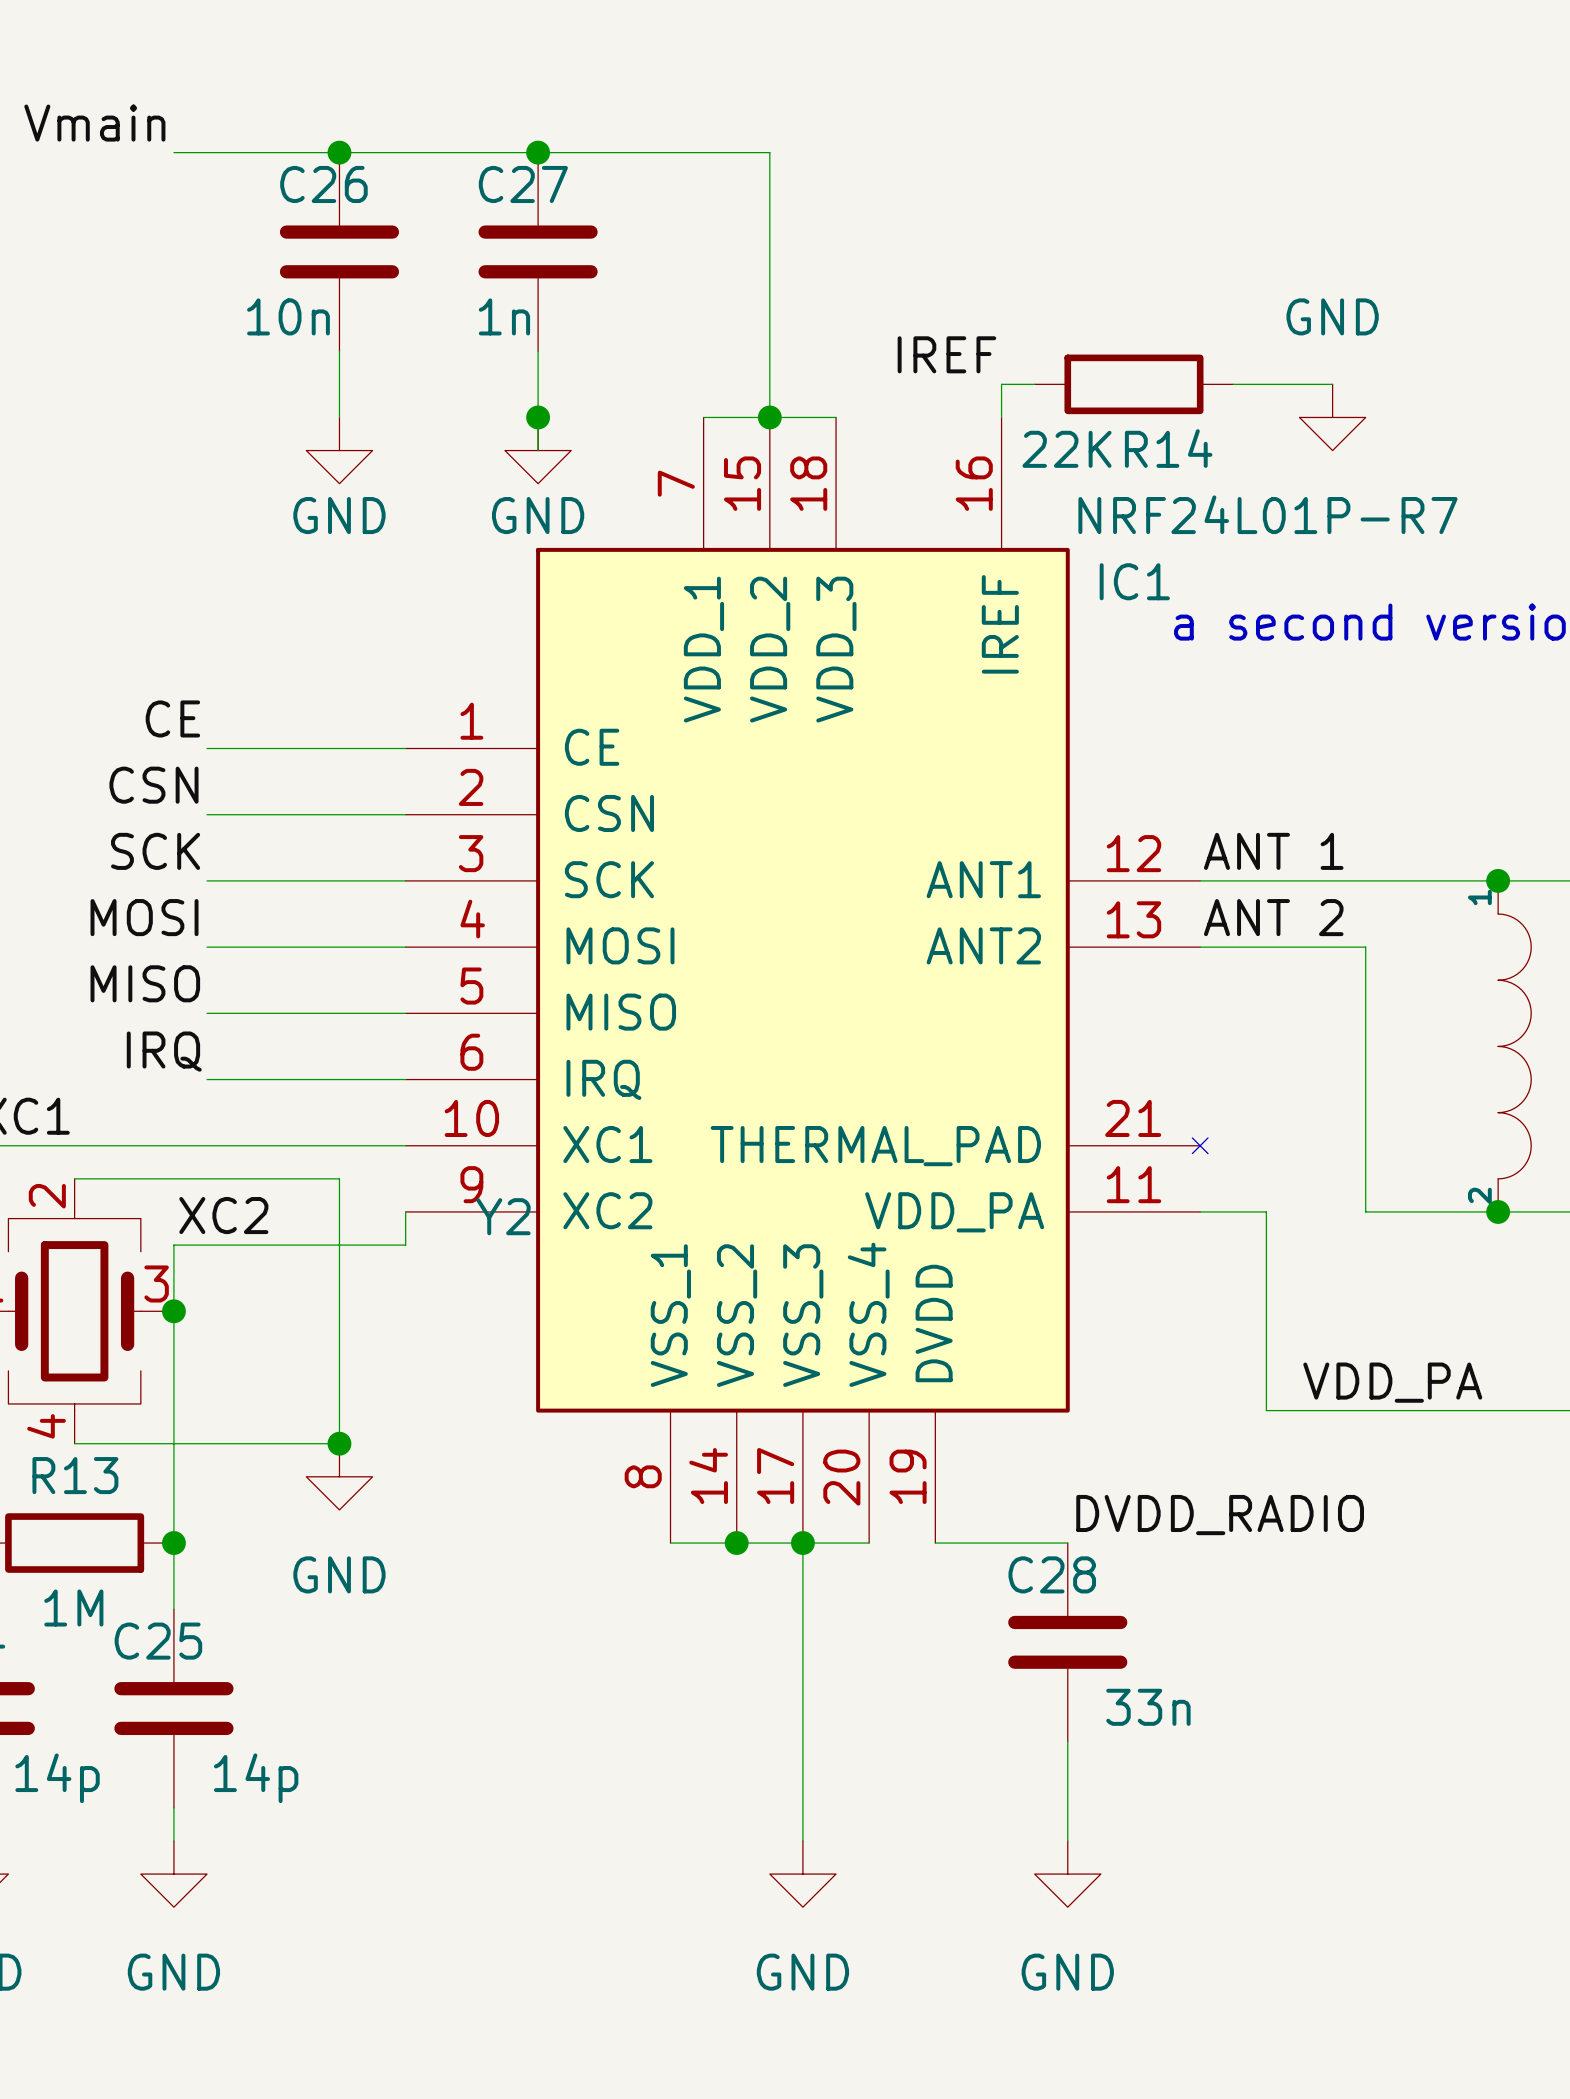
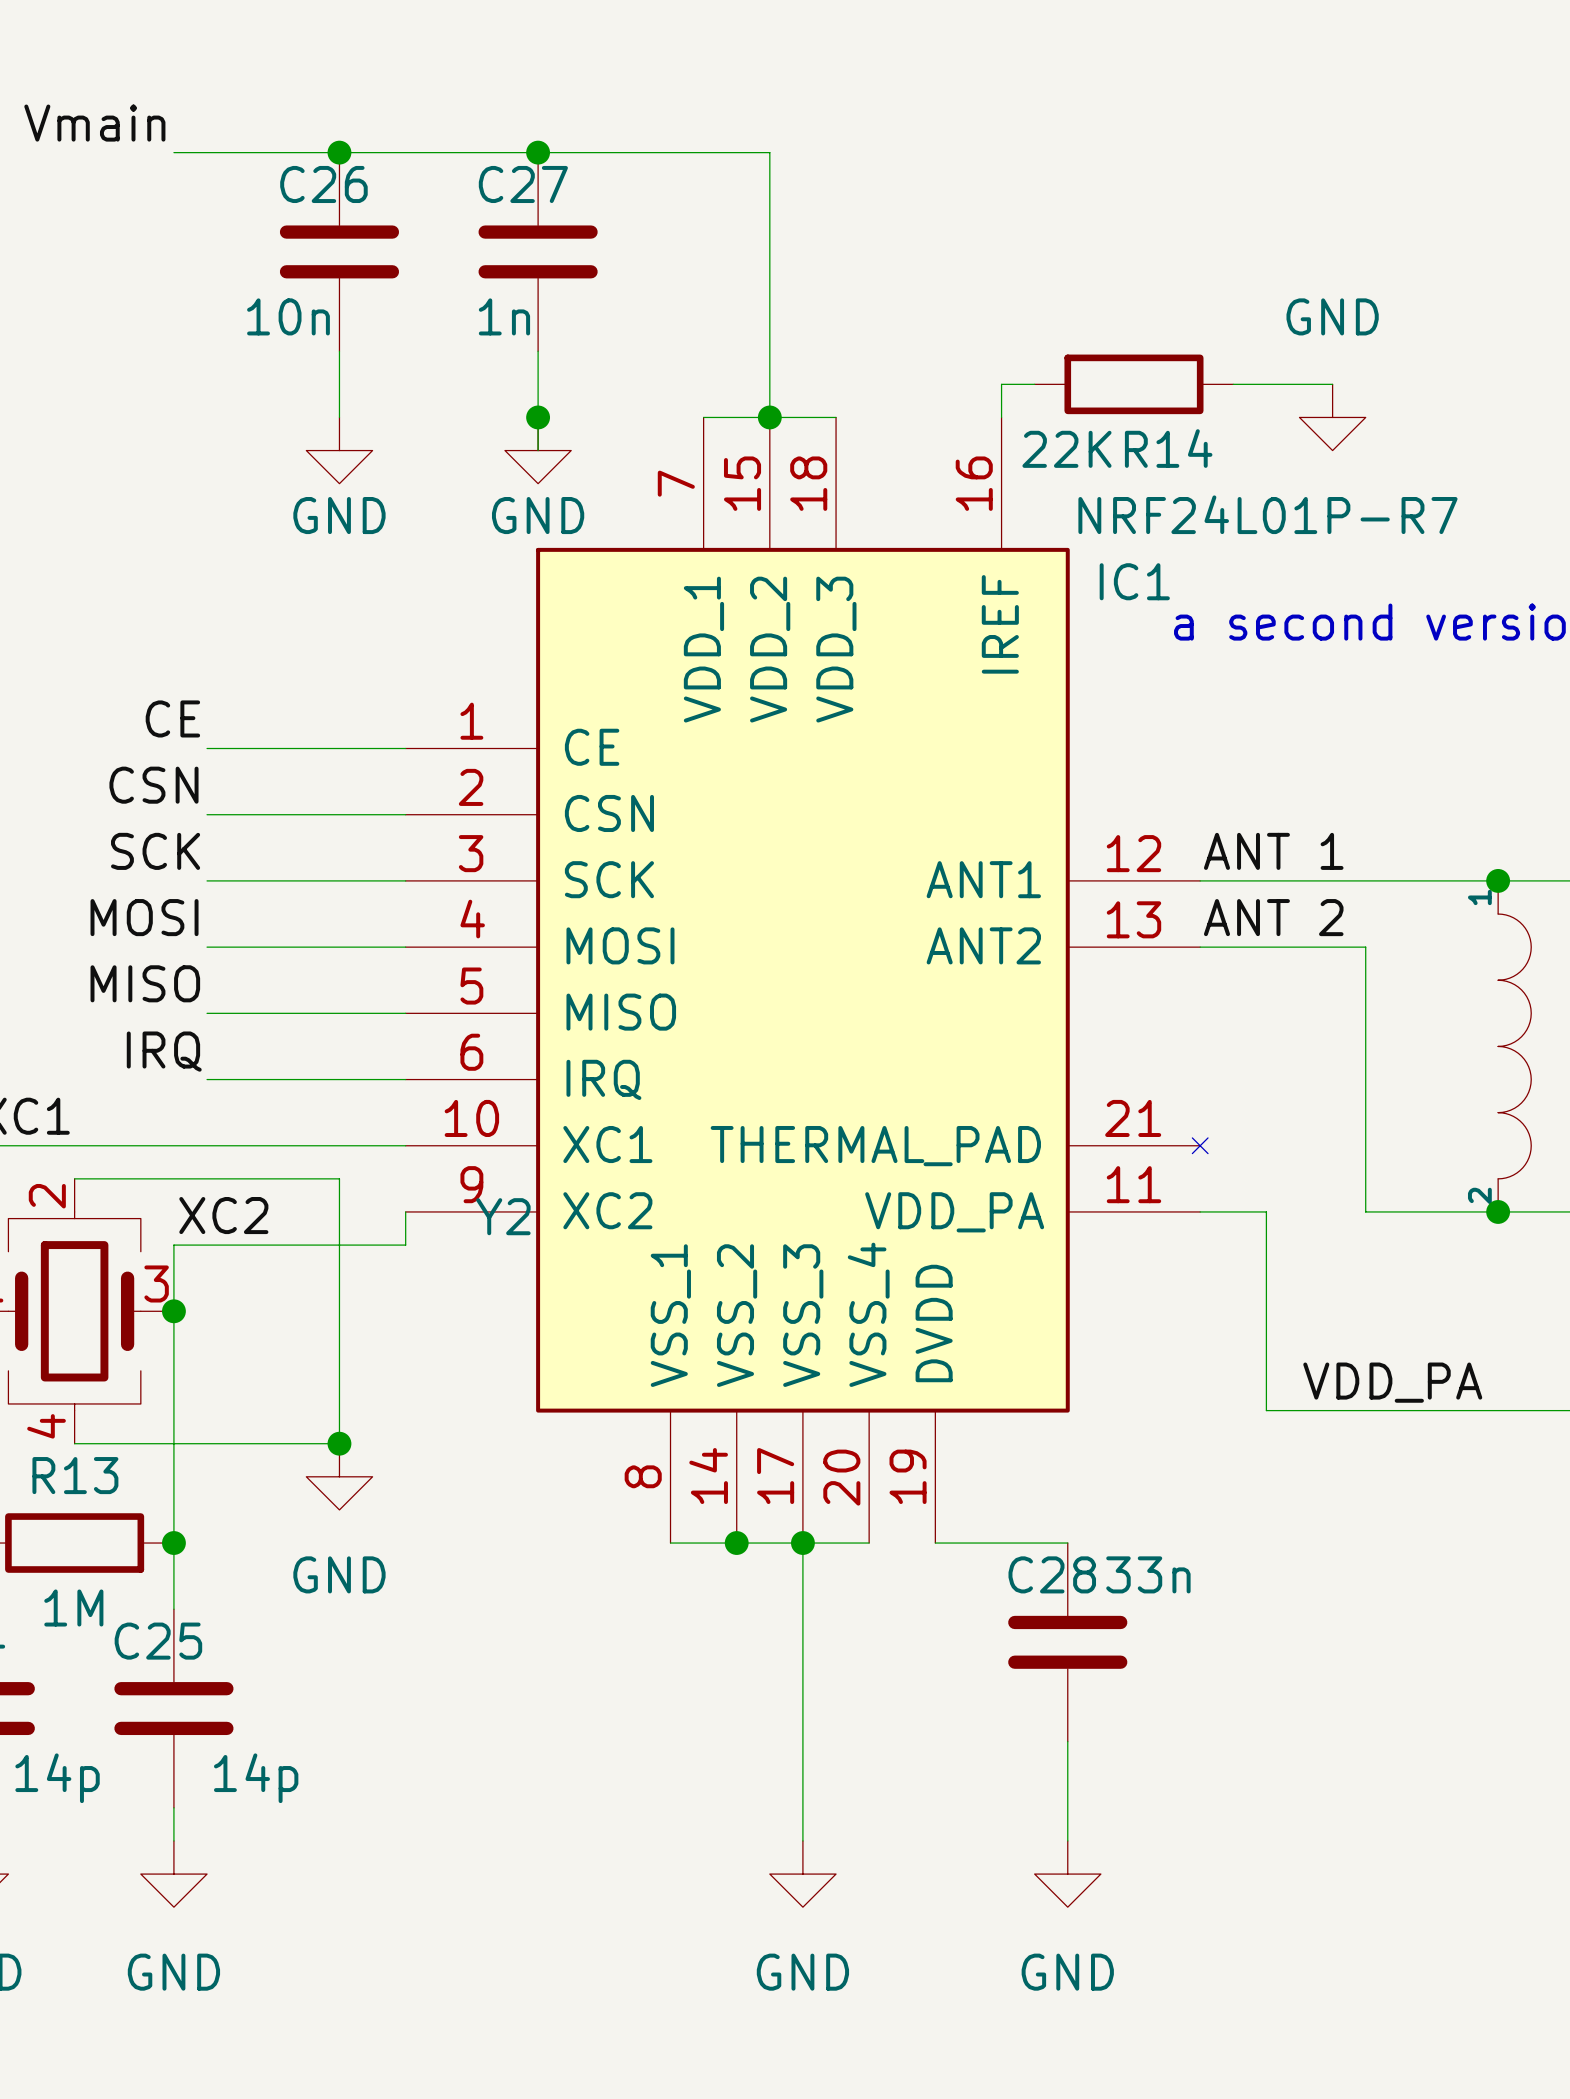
label: IREF (946, 354) -> none
label: DVDD_RADIO (1220, 1515) -> none
C28 value position: 33n (1148, 1707) -> 33n (1148, 1574)

